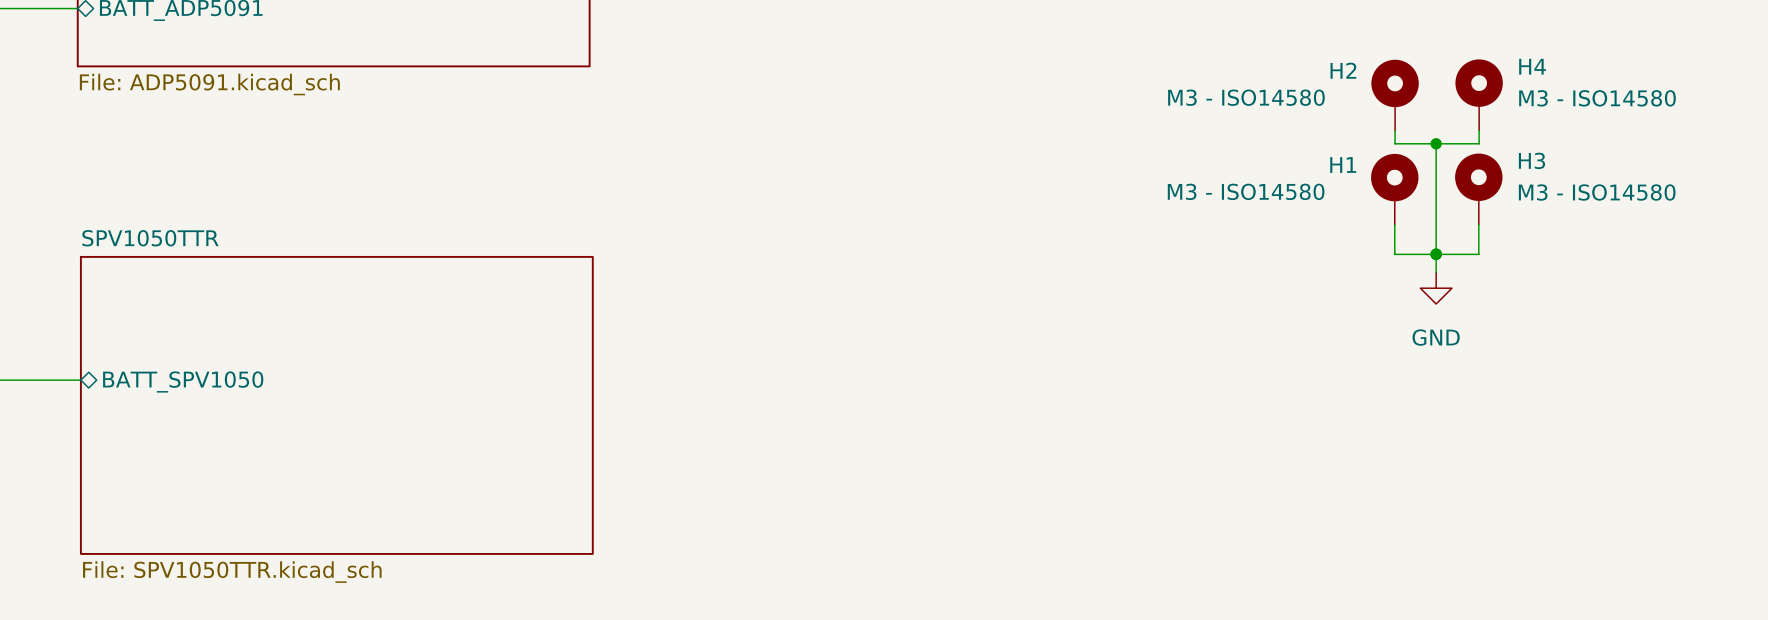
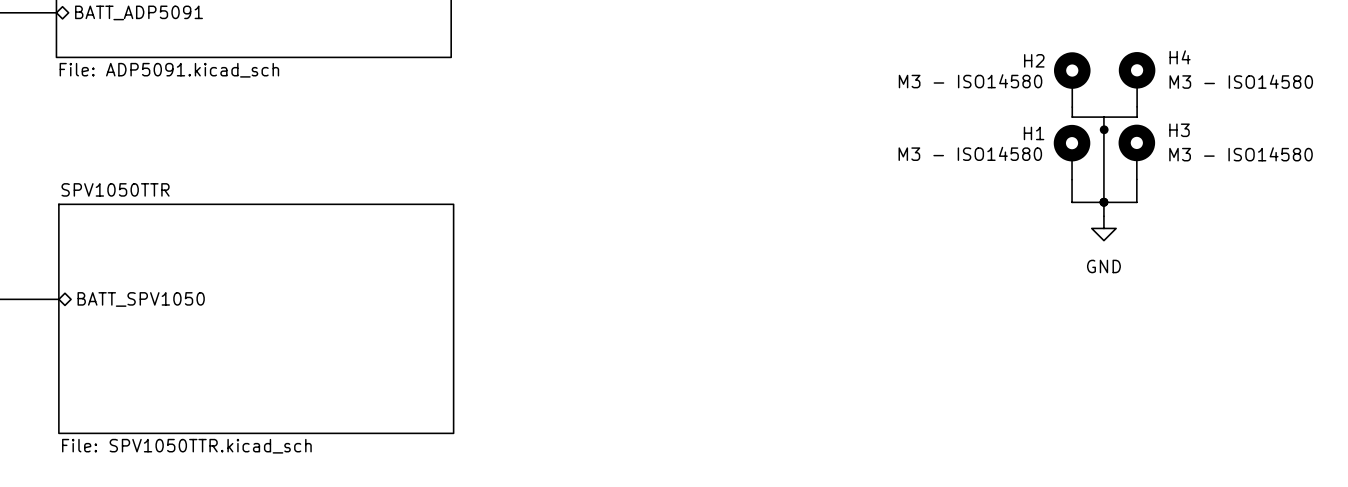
junction position: (1436, 143) -> (1104, 129)

